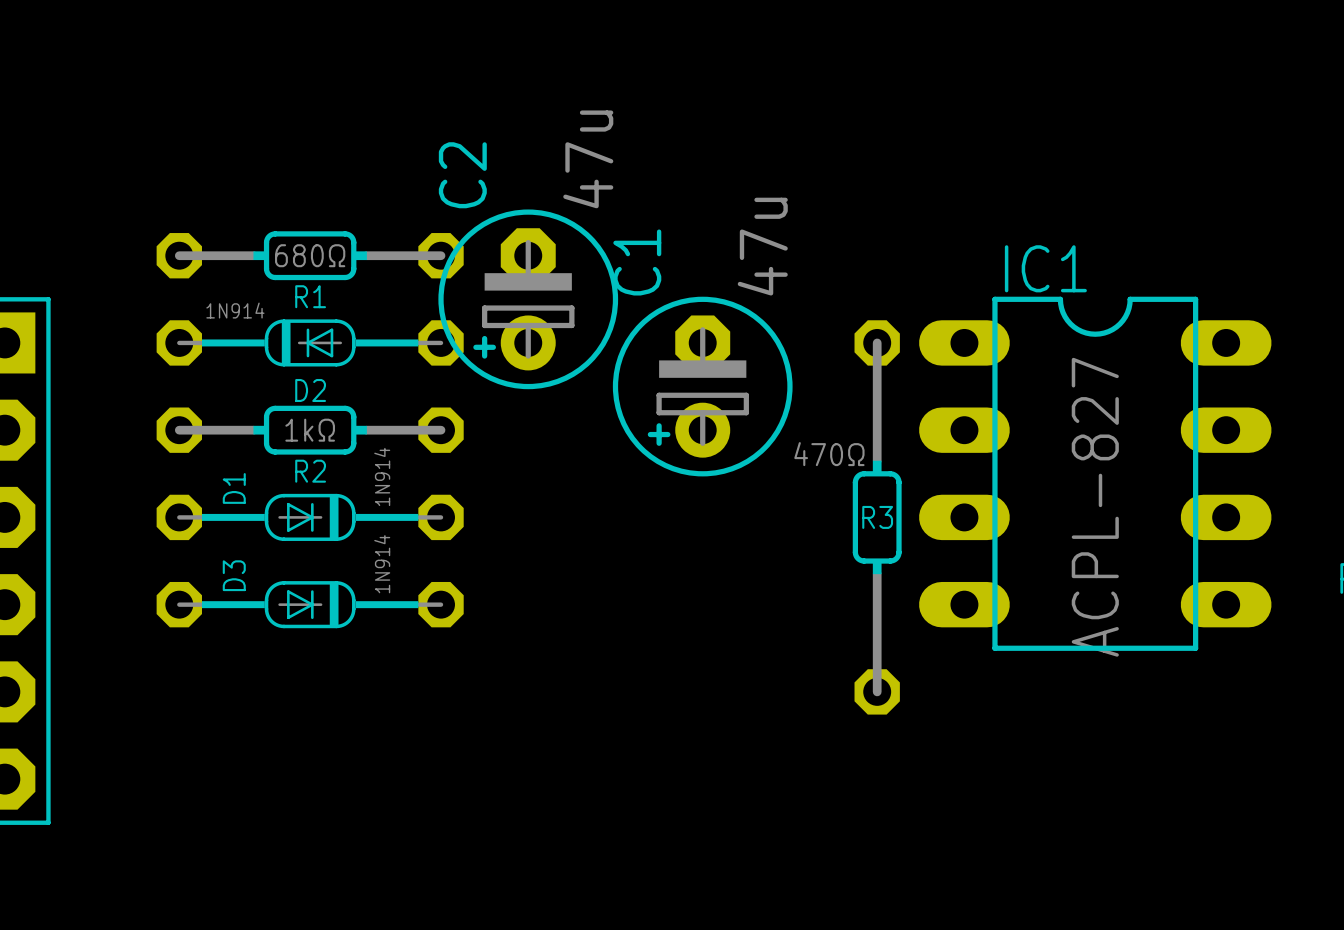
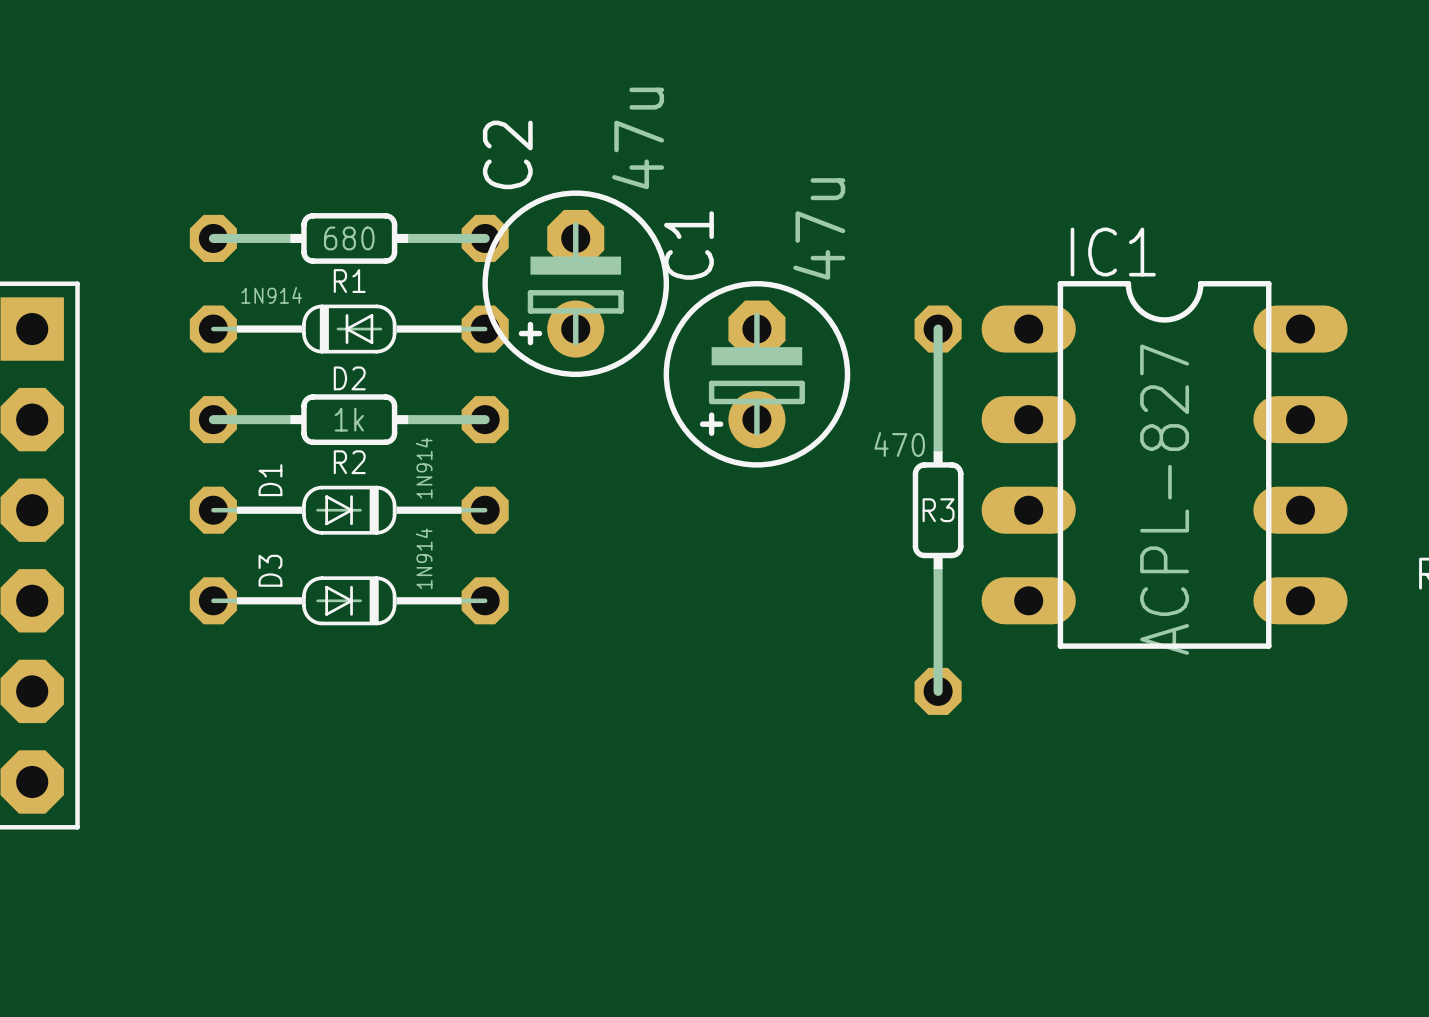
R1 value: 680Ω (310, 255) -> 680 (349, 238)
R2 value: 1kΩ (310, 430) -> 1k (349, 419)
R3 value: 470Ω (829, 454) -> 470 (899, 444)

